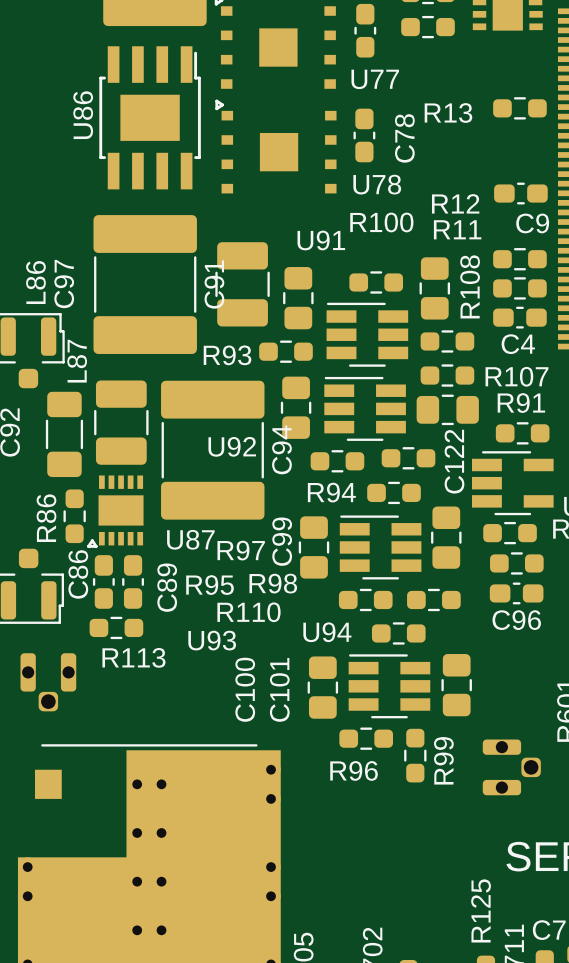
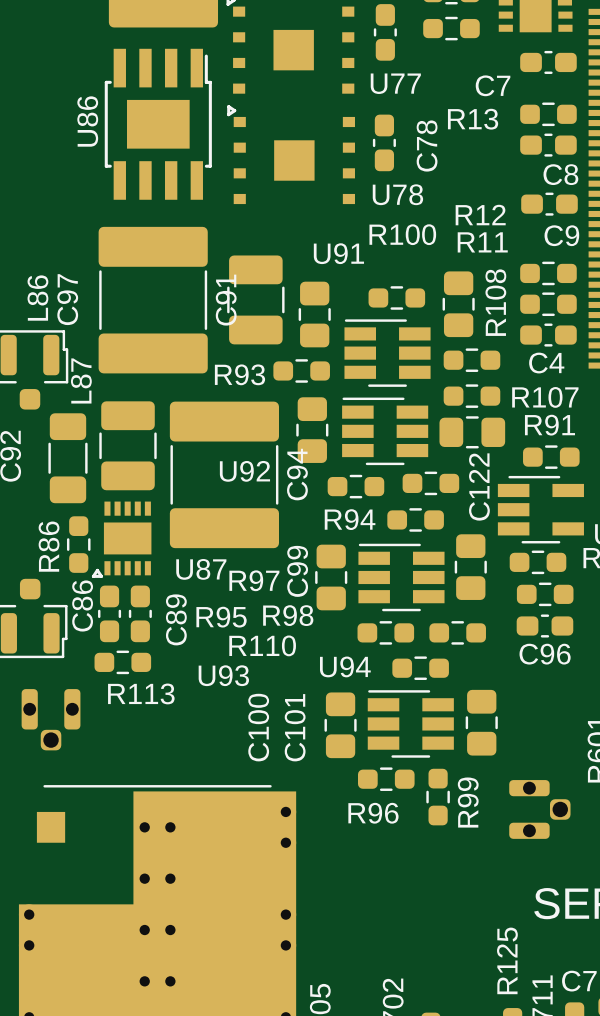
C7: none -> (548, 62)
C8: none -> (548, 145)

